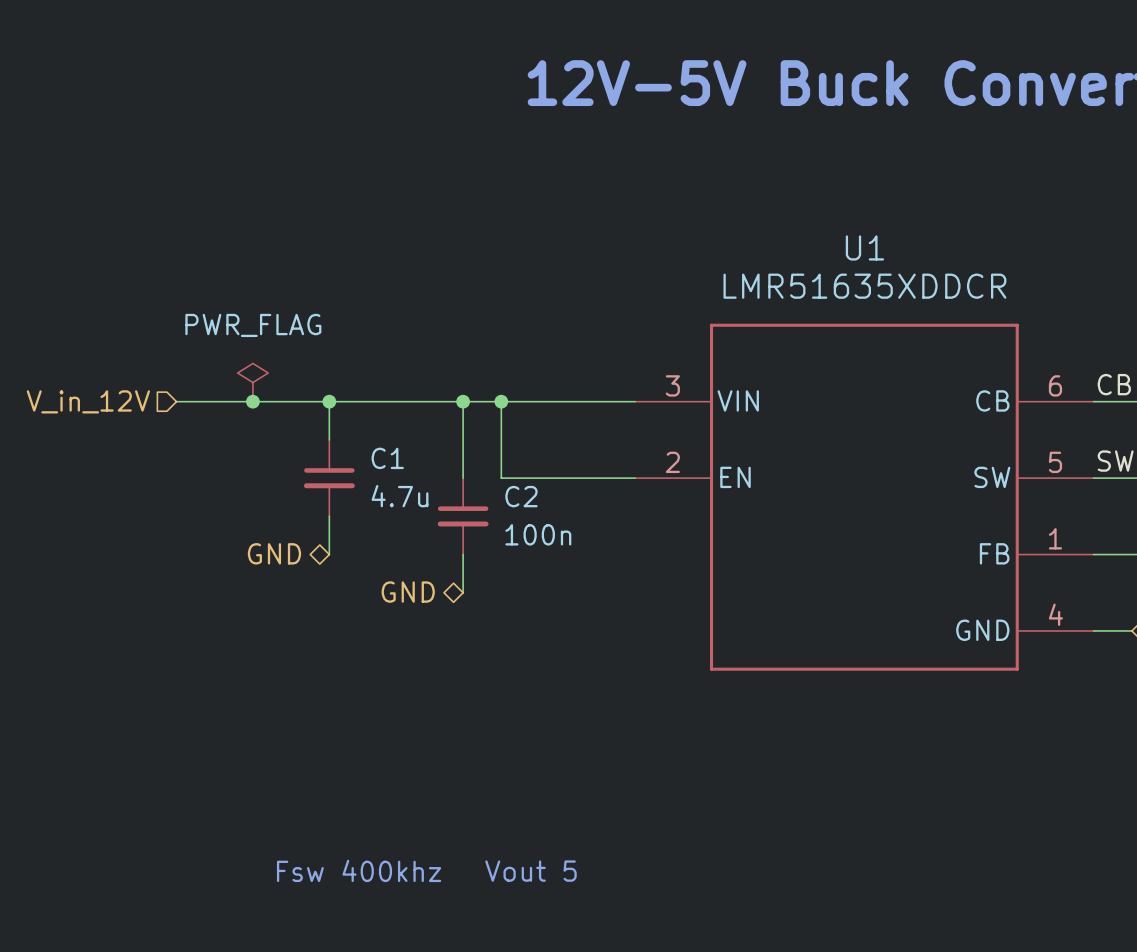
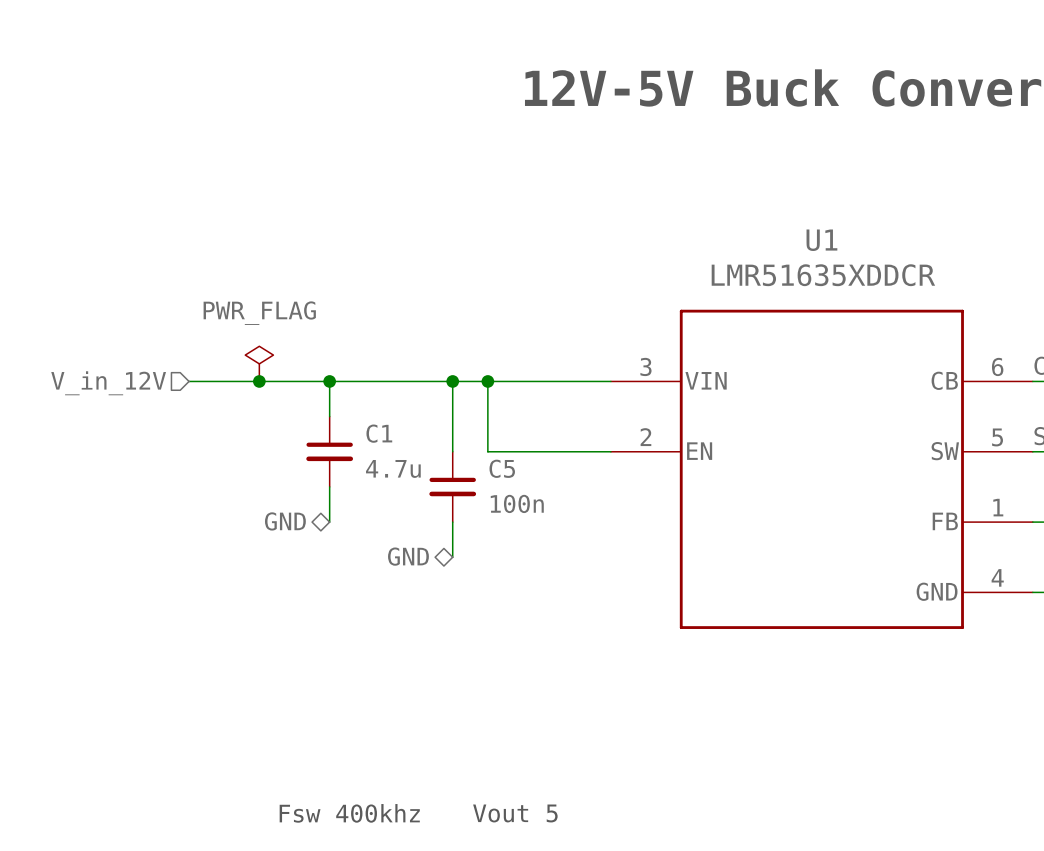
C2 name: C2 (521, 496) -> C5 (502, 468)

